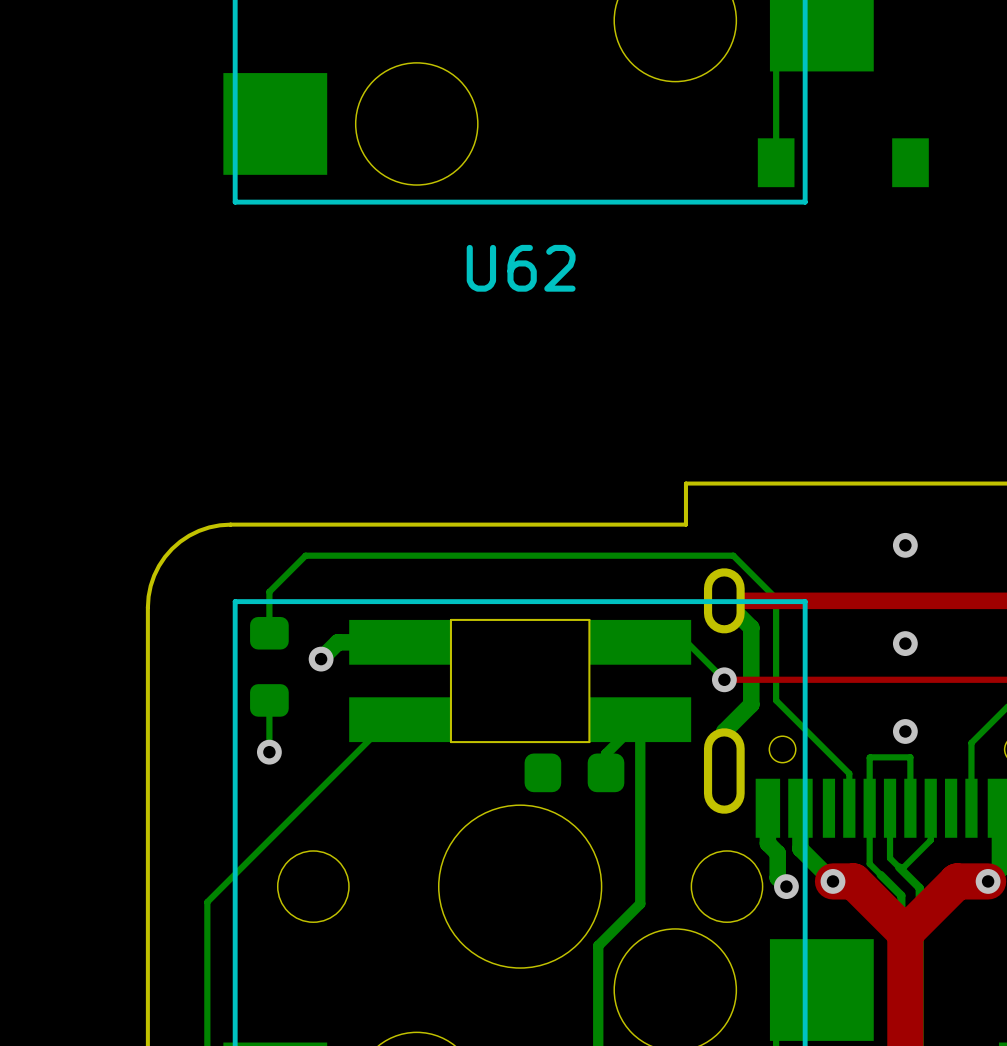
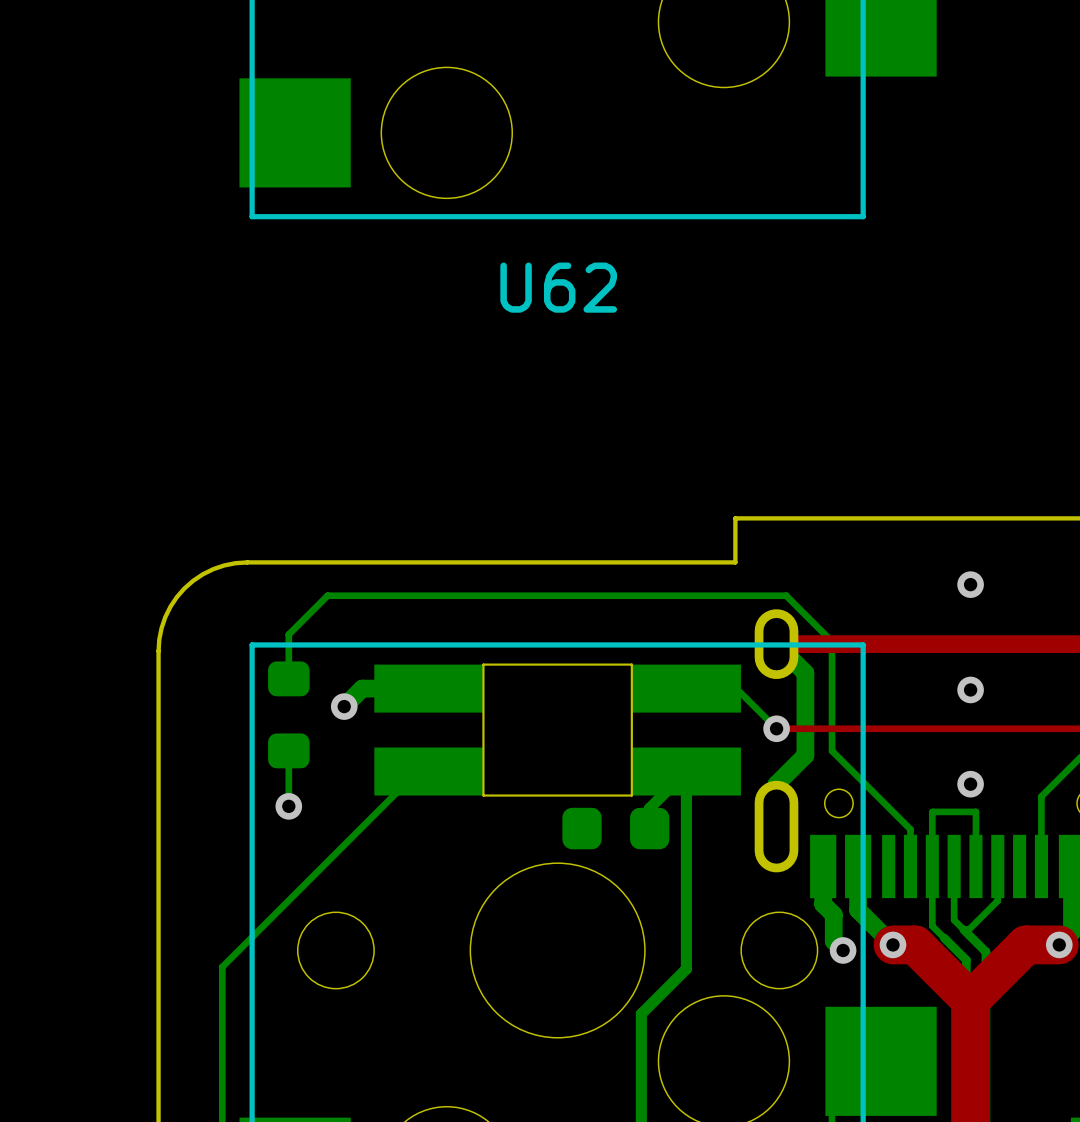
bottom track: (821, 20) (776, 66) (776, 162) -> none
part: (843, 162) -> none

